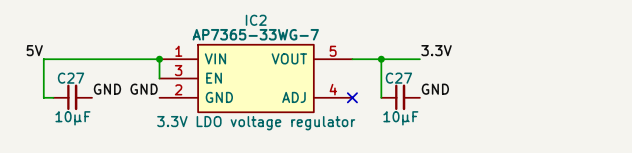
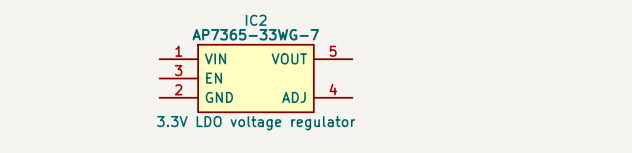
label: 5V (34, 50) -> none
label: 3.3V (436, 50) -> none
junction: (159, 59) -> none
wire: (352, 59) (419, 59) -> none
wire: (381, 59) (381, 97) -> none
junction: (381, 59) -> none
wire: (159, 78) (159, 59) (43, 59) (43, 97) (53, 97) -> none
label: GND (107, 89) -> none
label: GND (144, 89) -> none
label: GND (435, 89) -> none
C27: 10μF (72, 97) -> none
no-connect mark: (352, 97) -> none
C27: 10μF (400, 97) -> none

